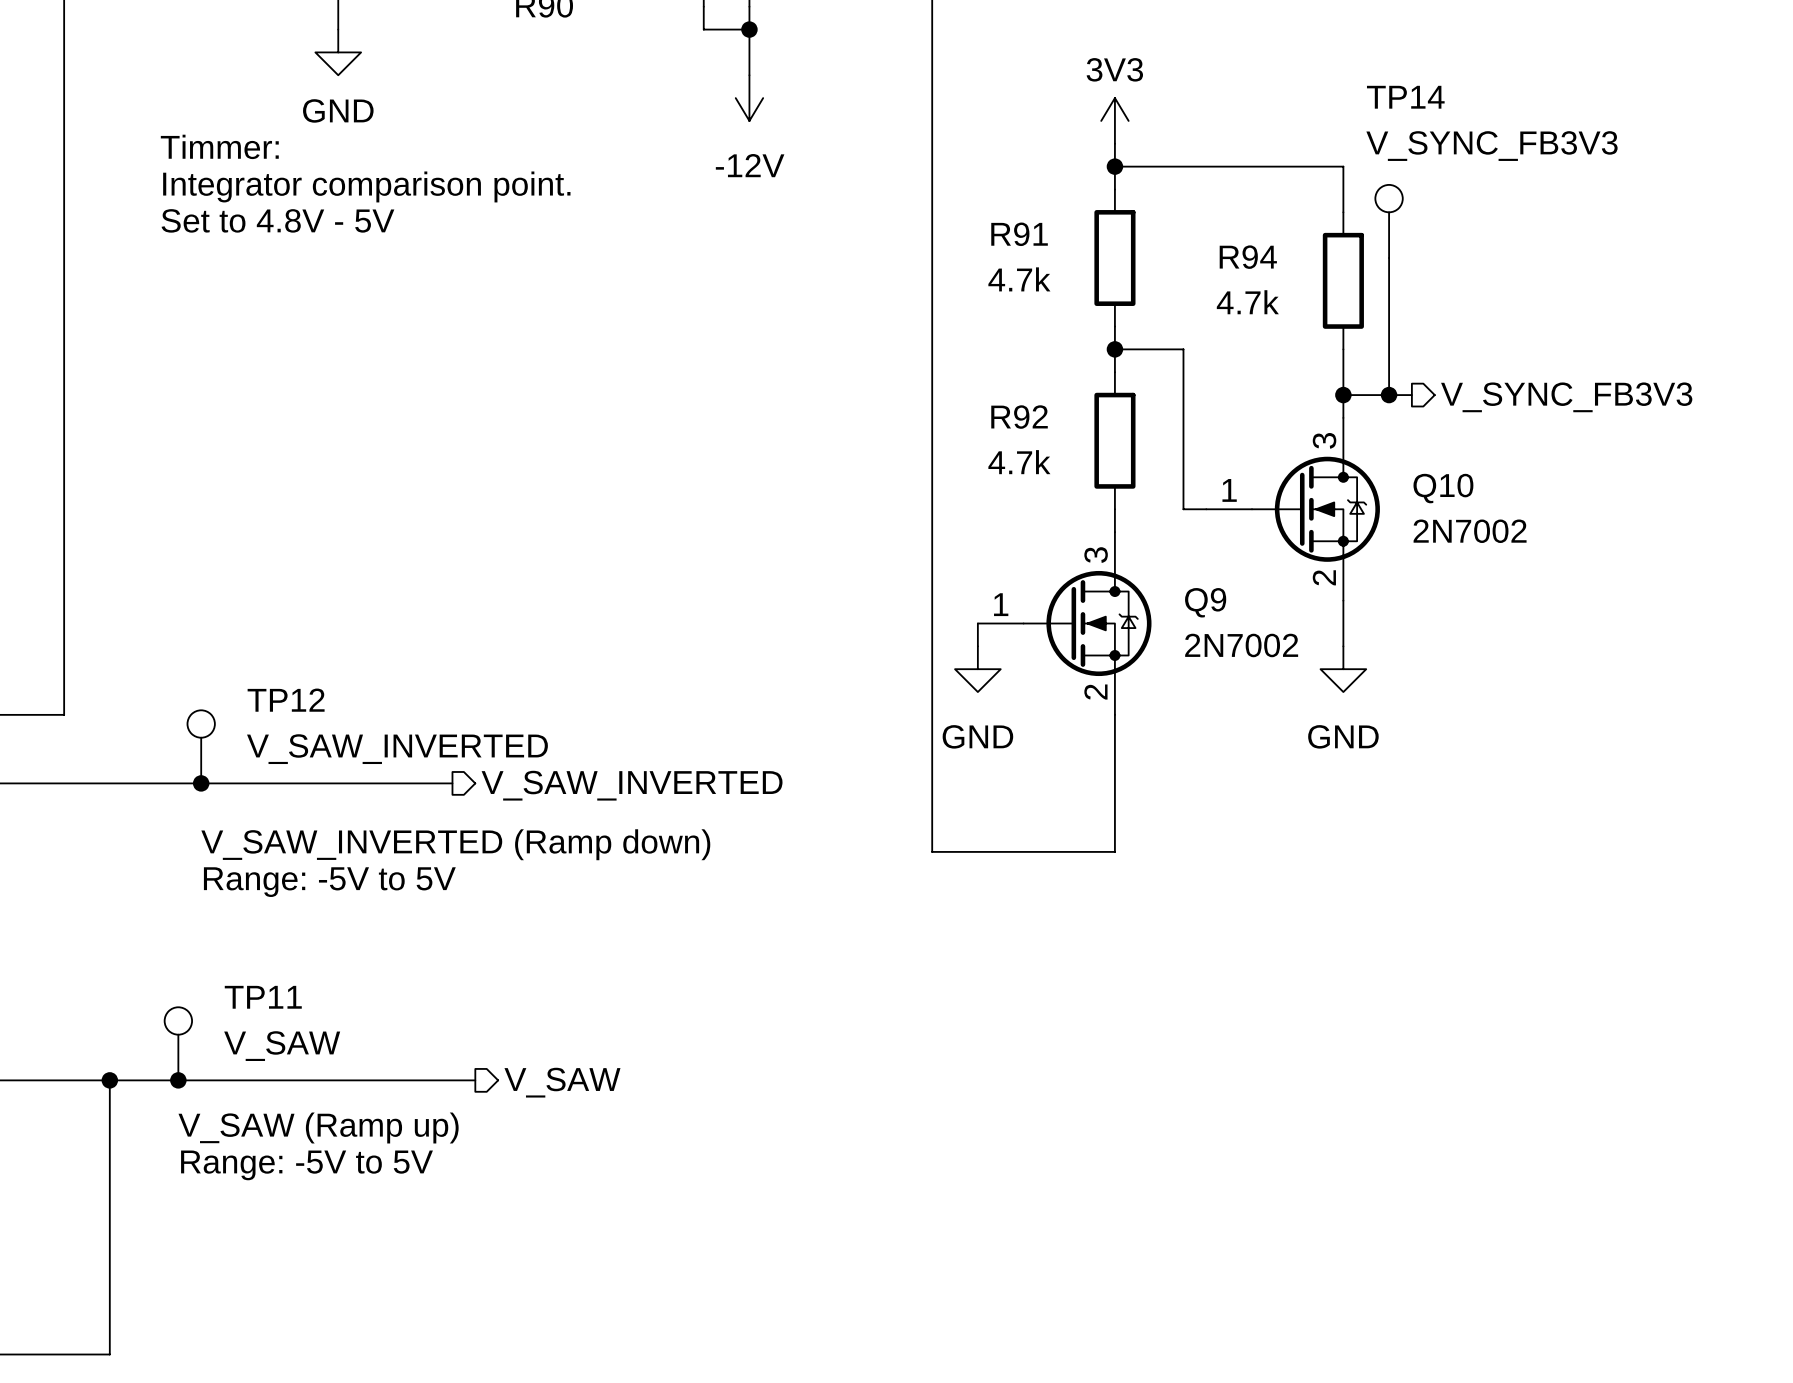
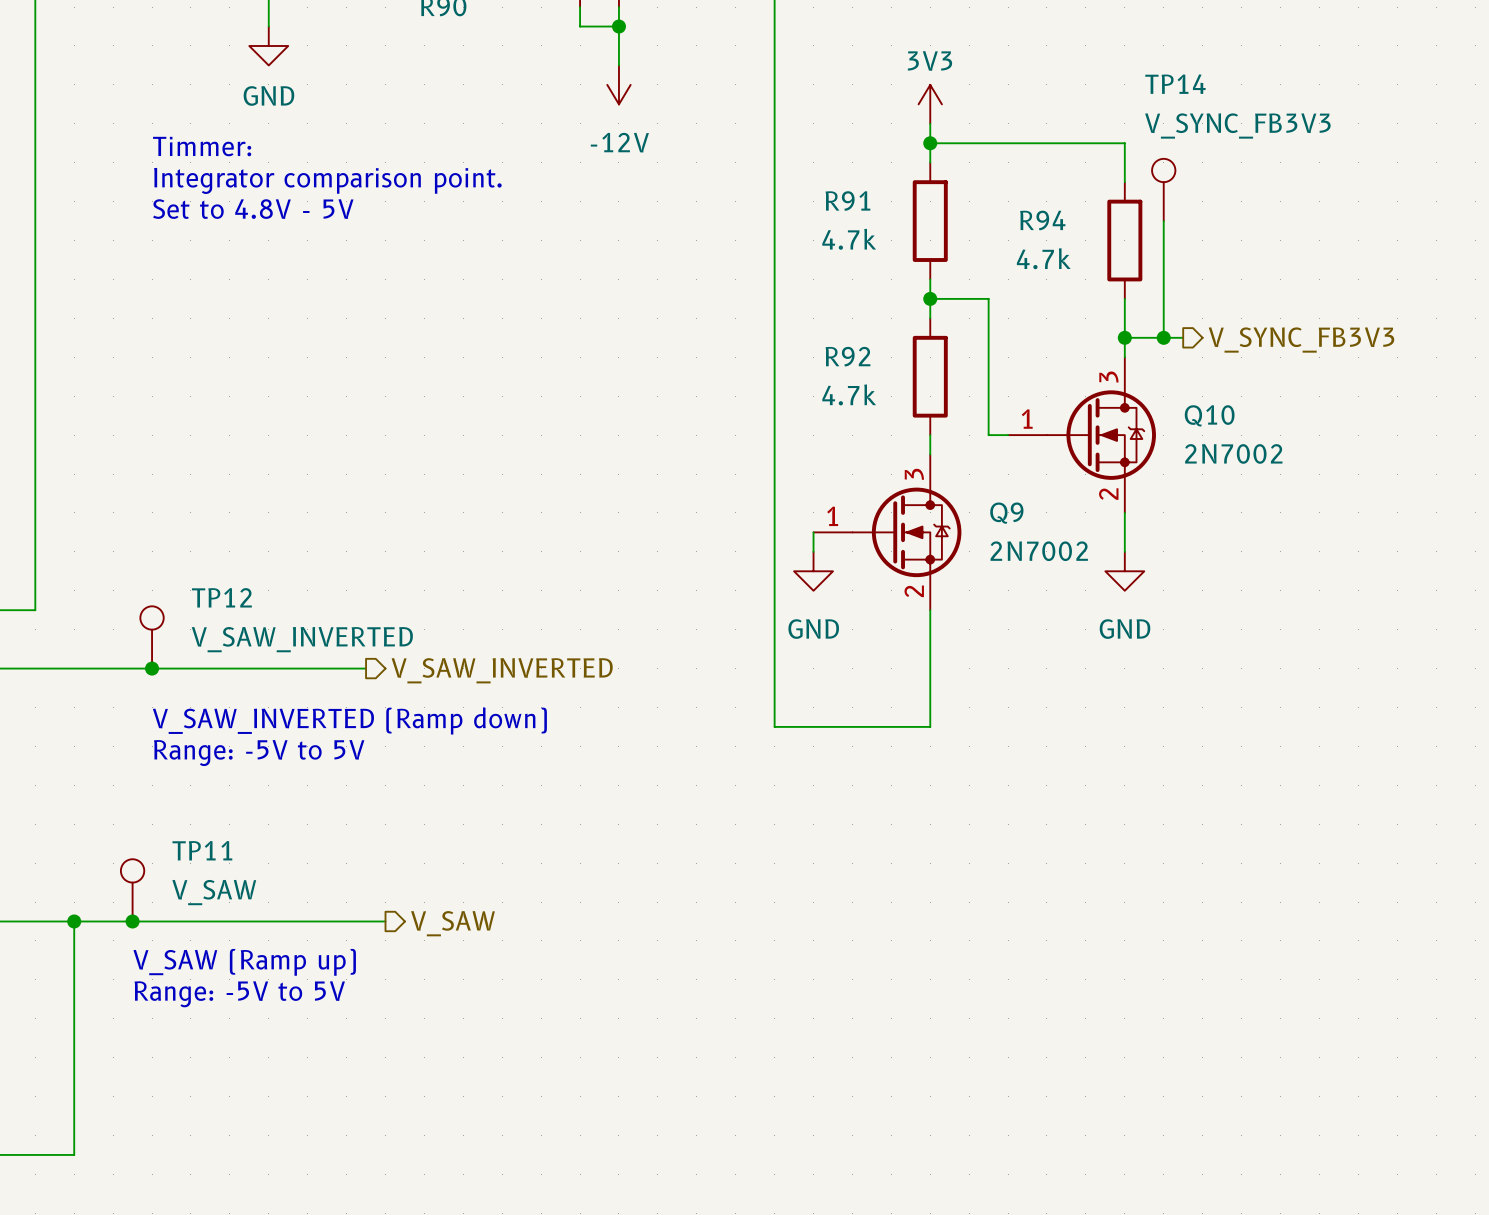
text position: Timmer: (219, 146) -> Timmer: (202, 146)
text position: Integrator comparison point. (366, 186) -> Integrator comparison point. (327, 180)
text position: Set to 4.8V - 5V (277, 220) -> Set to 4.8V - 5V (253, 209)

